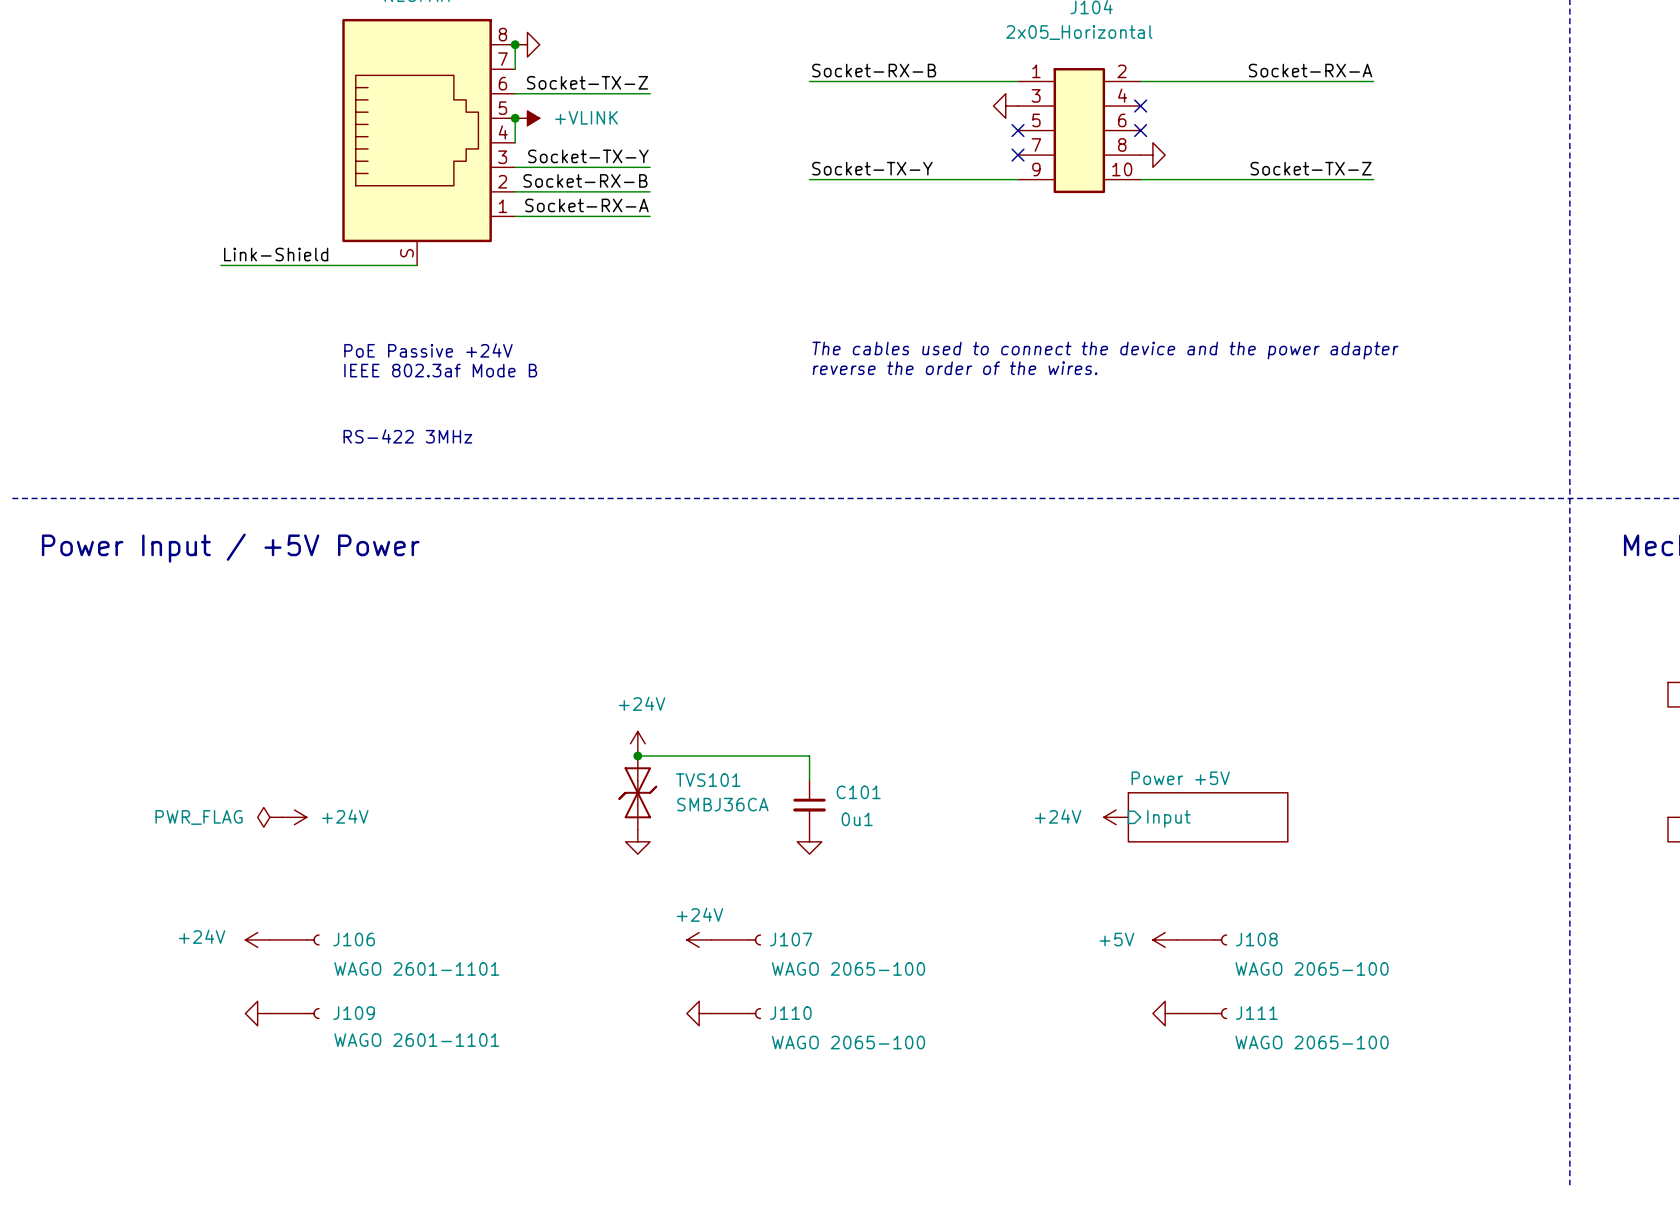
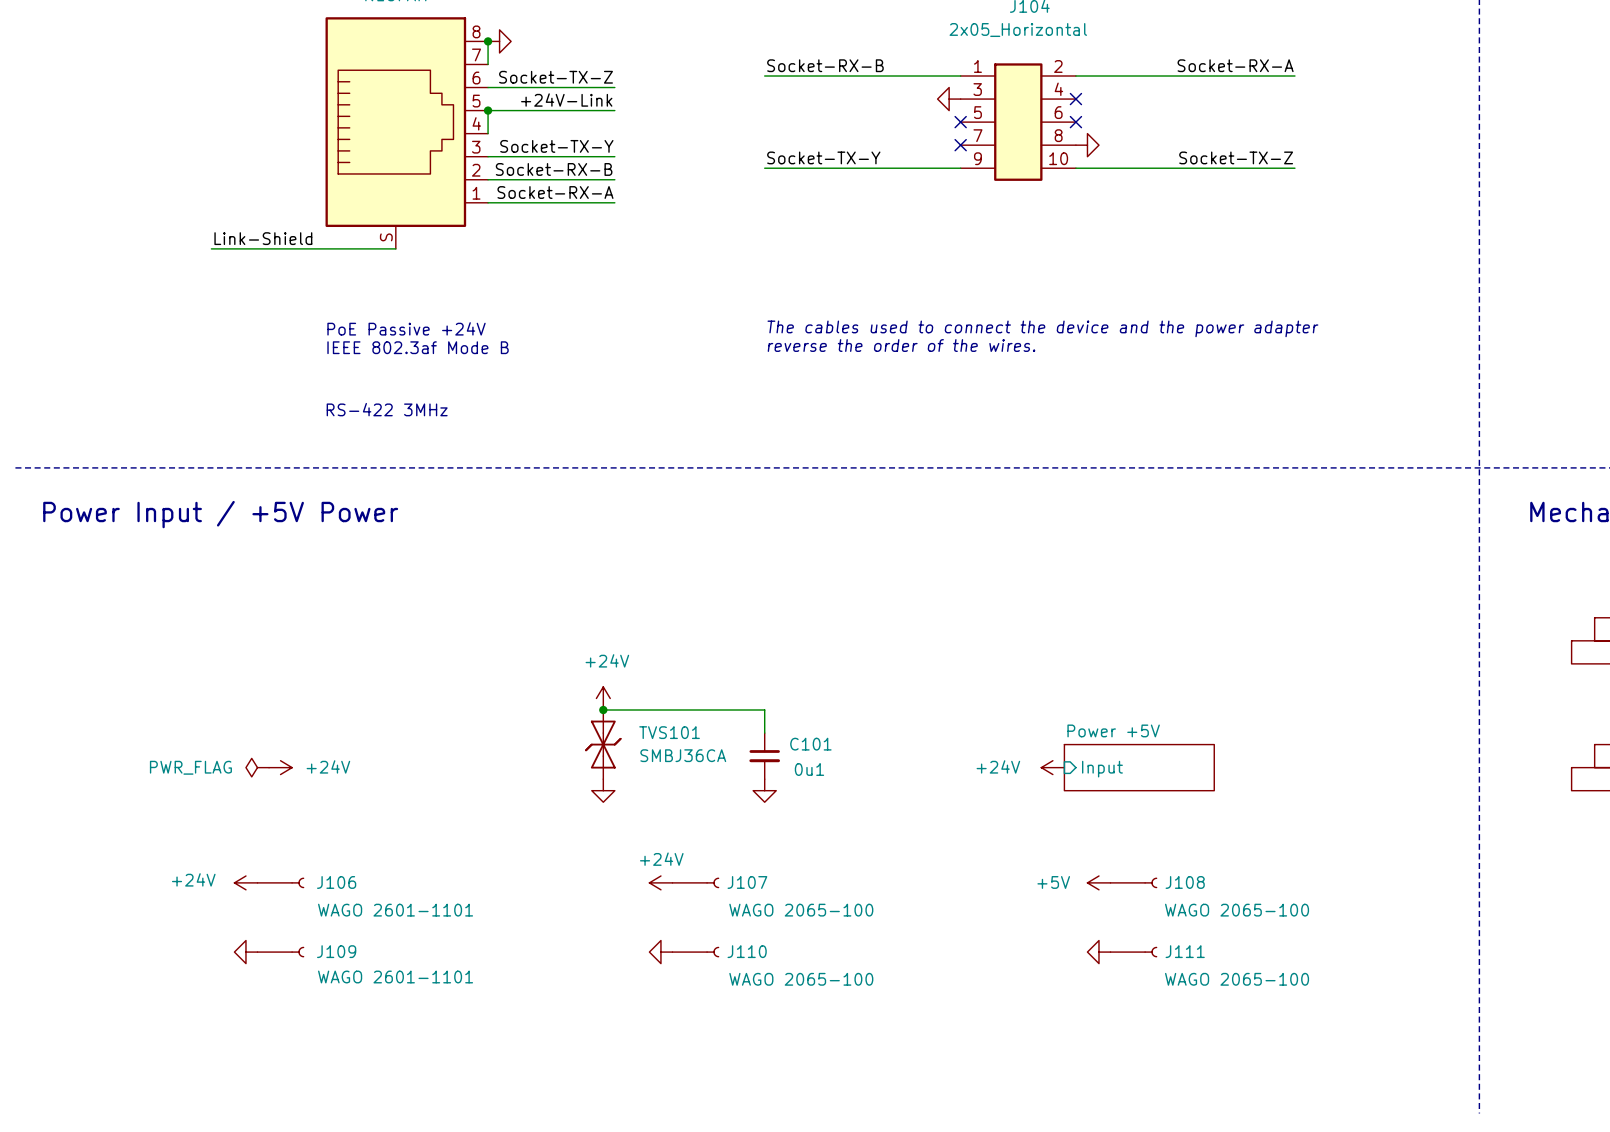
label: none -> +24V-Link (566, 100)
wire: none -> (488, 110) (614, 110)
power symbol: +VLINK (527, 118) -> none

